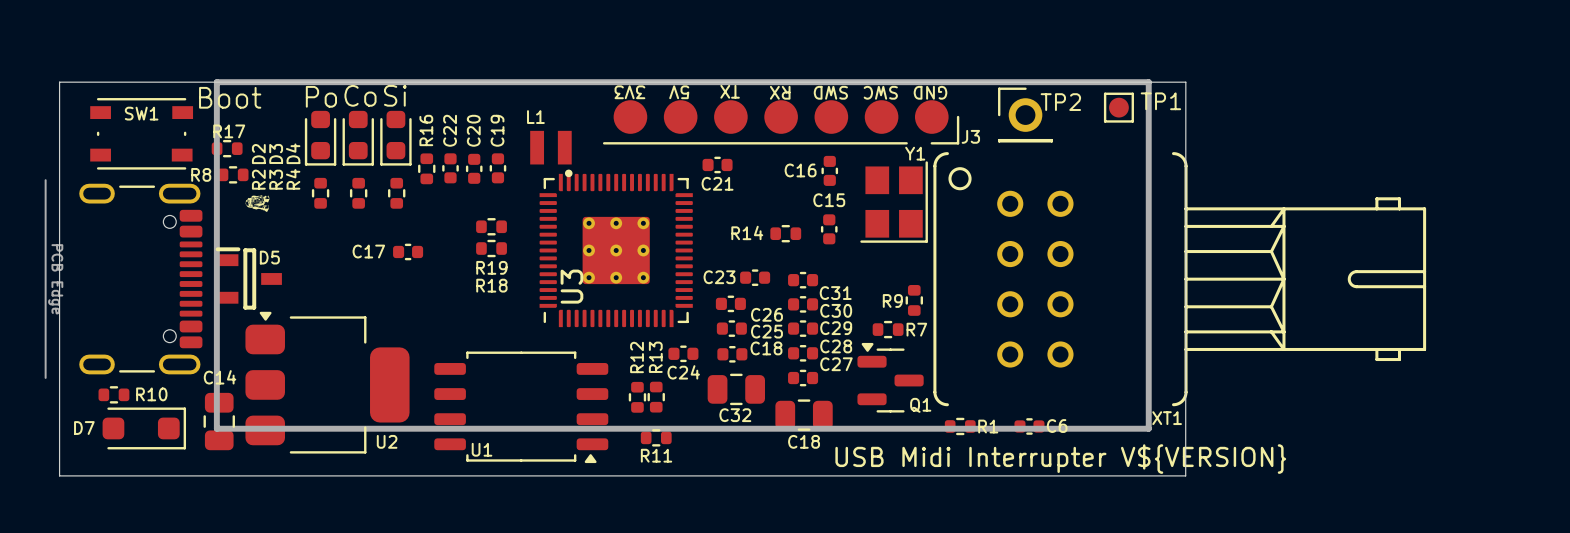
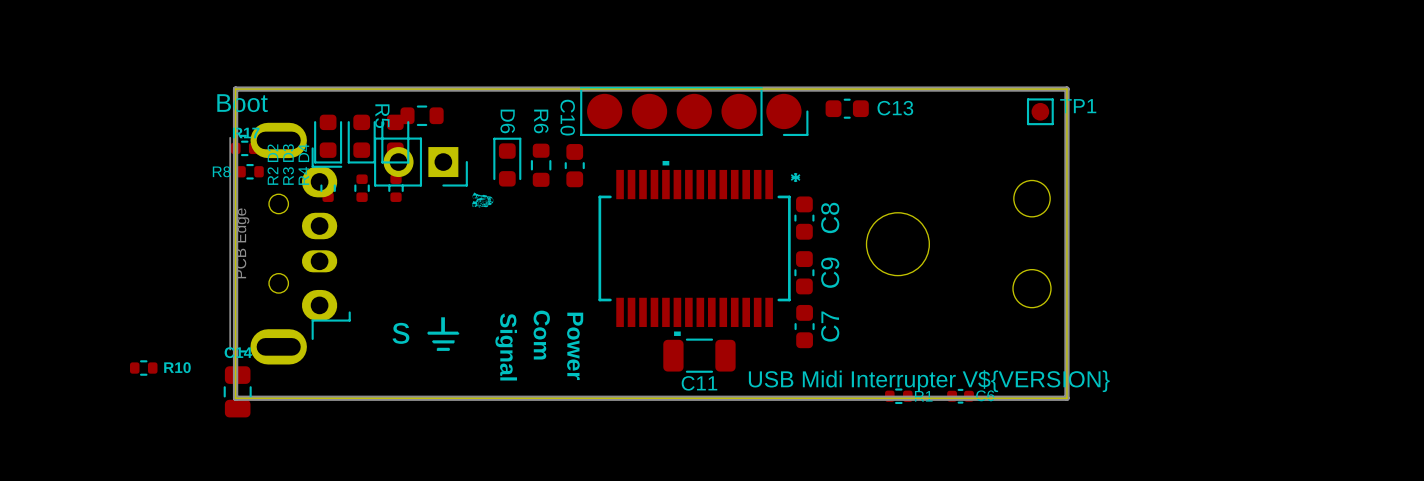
board edge: (216, 82) (59, 82) (59, 475) (1185, 475) (1185, 82) (1148, 82) -> (235, 89) (235, 398) (1066, 398) (1066, 89)
text: TX (730, 91) -> none
text: 3V3 (629, 92) -> none
text: 5V (679, 92) -> none
text: RX (780, 92) -> none
text: SWD (830, 92) -> none
text: SWC (880, 92) -> none
text: GND (930, 92) -> none
text: Co (360, 95) -> none
text: Si (395, 95) -> none
text: Po (321, 96) -> none
C13: none -> (847, 108)
part: none -> (694, 111)
R5: none -> (422, 115)
TP2: (1025, 115) -> none
J3: (781, 122) -> none
SW1: (141, 133) -> none
L1: (551, 154) -> none
part: none -> (420, 162)
D6: none -> (507, 162)
C21: (717, 164) -> none
R6: none -> (541, 165)
C10: none -> (574, 165)
R16: (426, 168) -> none
C22: (450, 168) -> none
C20: (474, 168) -> none
C19: (497, 168) -> none
C16: (829, 170) -> none
round board edge: none -> [1013, 180, 1051, 218]
drawing: [245, 195, 270, 212] -> none
drawing position: (260, 197) -> (480, 205)
drawing: none -> [472, 192, 494, 208]
Y1: (894, 202) -> none
round board edge: none -> [866, 212, 930, 277]
R19: (491, 226) -> none
C8: none -> (804, 218)
C15: (829, 229) -> none
R14: (785, 233) -> none
R18: (491, 248) -> none
U3: (616, 250) -> none
C17: (408, 251) -> none
part: none -> (290, 243)
part: none -> (694, 248)
C23: (755, 277) -> none
D5: (248, 278) -> none
part: (123, 279) -> none
XT1: (1179, 279) -> none
C31: (803, 280) -> none
round board edge: none -> [1012, 269, 1052, 309]
C9: none -> (804, 272)
R9: (914, 300) -> none
C26: (730, 303) -> none
C30: (803, 304) -> none
C25: (731, 328) -> none
C29: (803, 328) -> none
R7: (888, 329) -> none
drawing: none -> [427, 317, 460, 351]
C7: none -> (804, 326)
C24: (683, 353) -> none
C28: (803, 353) -> none
C18: (732, 354) -> none
text: none -> Com (541, 335)
text: none -> s (400, 333)
text: none -> Signal (506, 347)
text: none -> Power (575, 346)
Q1: (890, 377) -> none
C27: (803, 378) -> none
C11: none -> (699, 355)
U2: (327, 382) -> none
C32: (736, 389) -> none
R12: (637, 397) -> none
R13: (656, 397) -> none
U1: (521, 407) -> none
C18: (804, 415) -> none
D7: (144, 428) -> none
R11: (656, 437) -> none
text position: USB Midi Interrupter V${VERSION} (1060, 459) -> USB Midi Interrupter V${VERSION} (929, 381)

